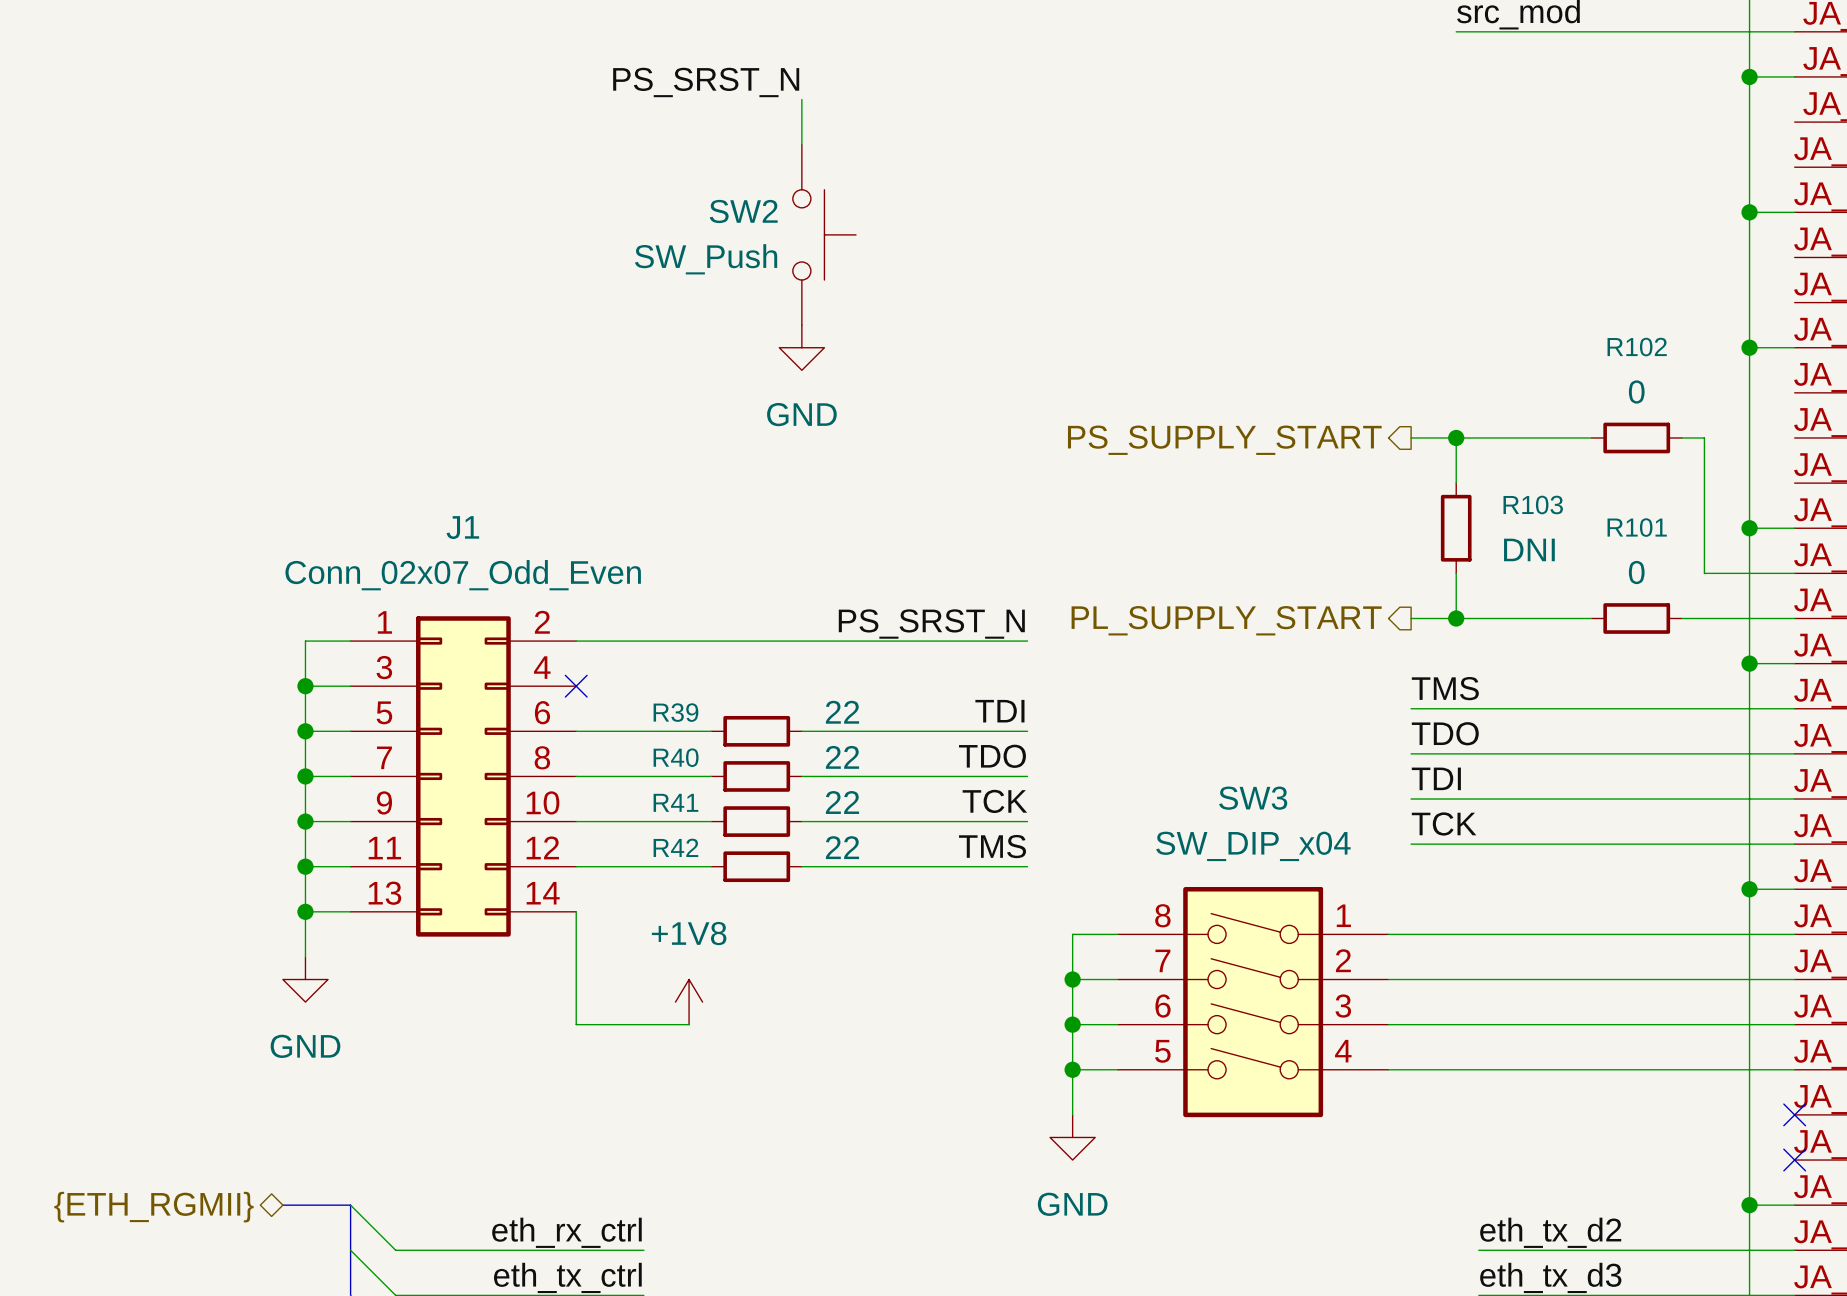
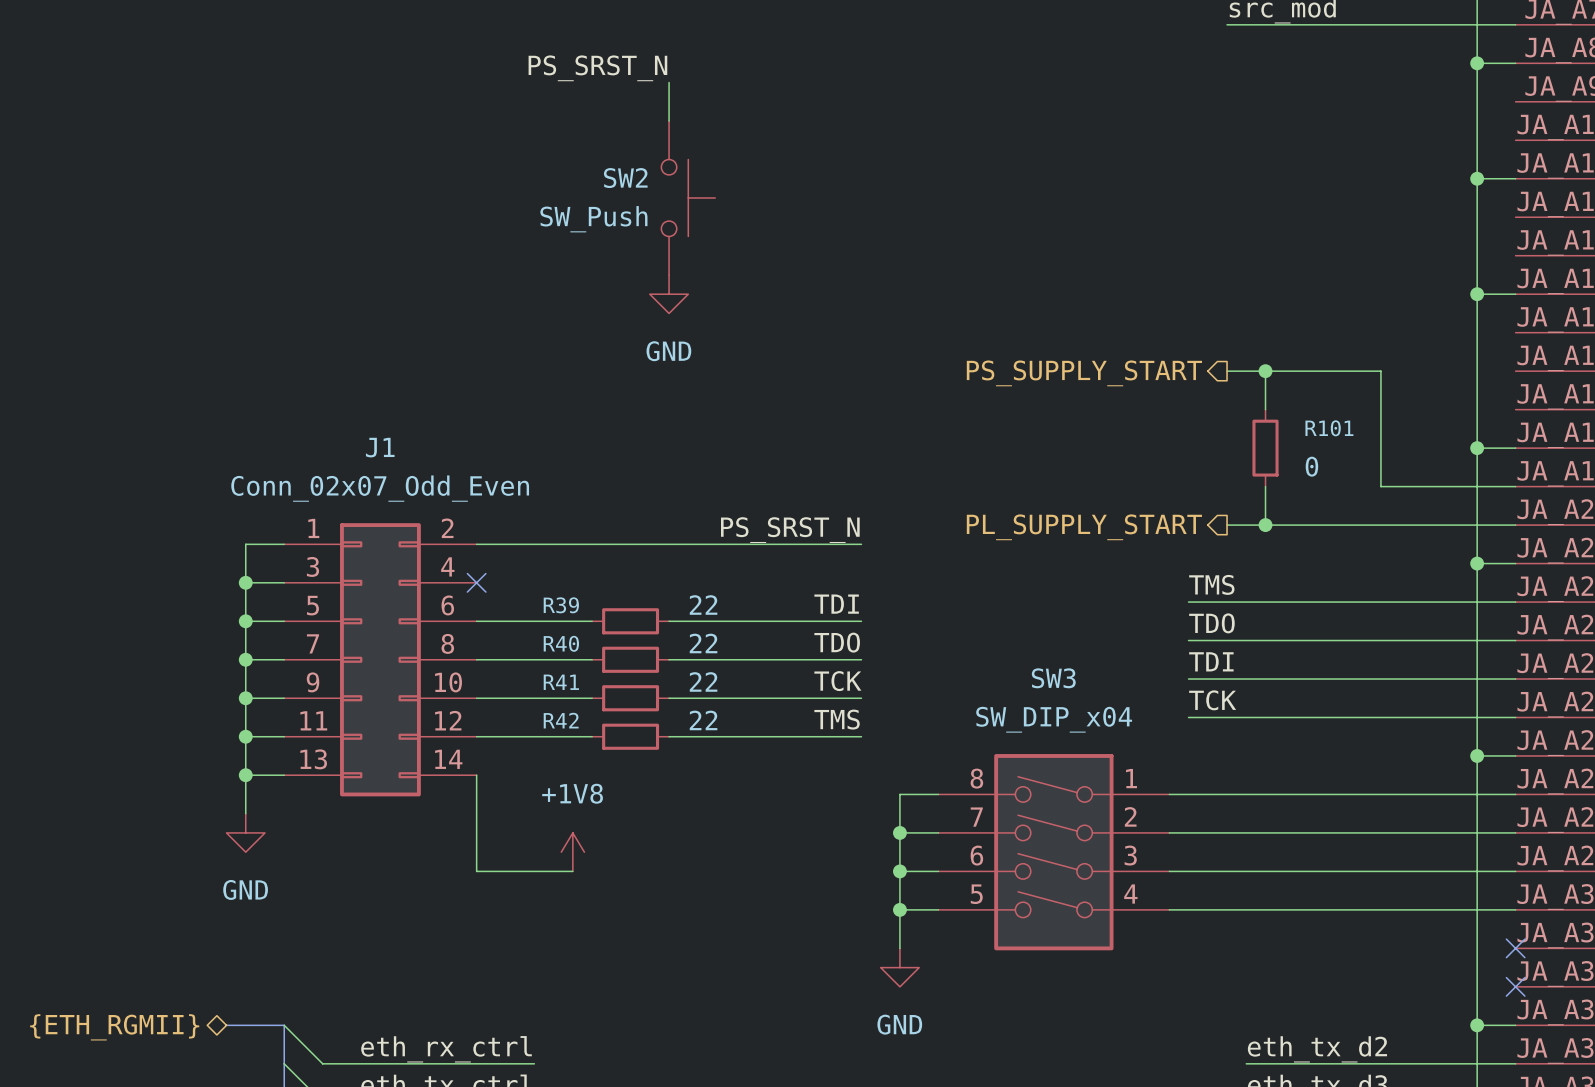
wire: (1411, 437) (1456, 437) (1456, 483) -> none
junction position: (1456, 437) -> (1265, 371)
wire: none -> (1265, 371) (1265, 409)
R102: 0 (1636, 437) -> none
wire: (1681, 437) (1704, 437) (1704, 573) -> (1342, 371) (1380, 371) (1380, 486) (1438, 486)
hierarchical label position: PS_SUPPLY_START (1224, 440) -> PS_SUPPLY_START (1084, 373)
R103: DNI (1456, 528) -> none
wire: (1456, 573) (1456, 618) (1411, 618) -> none
wire: none -> (1265, 486) (1265, 525)
junction position: (1456, 618) -> (1265, 525)
wire: none -> (1342, 525) (1419, 525)
R101 rotation: 0° (1636, 618) -> 90° clockwise (1265, 448)
R101 position: (1636, 618) -> (1265, 448)
hierarchical label position: PL_SUPPLY_START (1226, 620) -> PL_SUPPLY_START (1084, 527)

